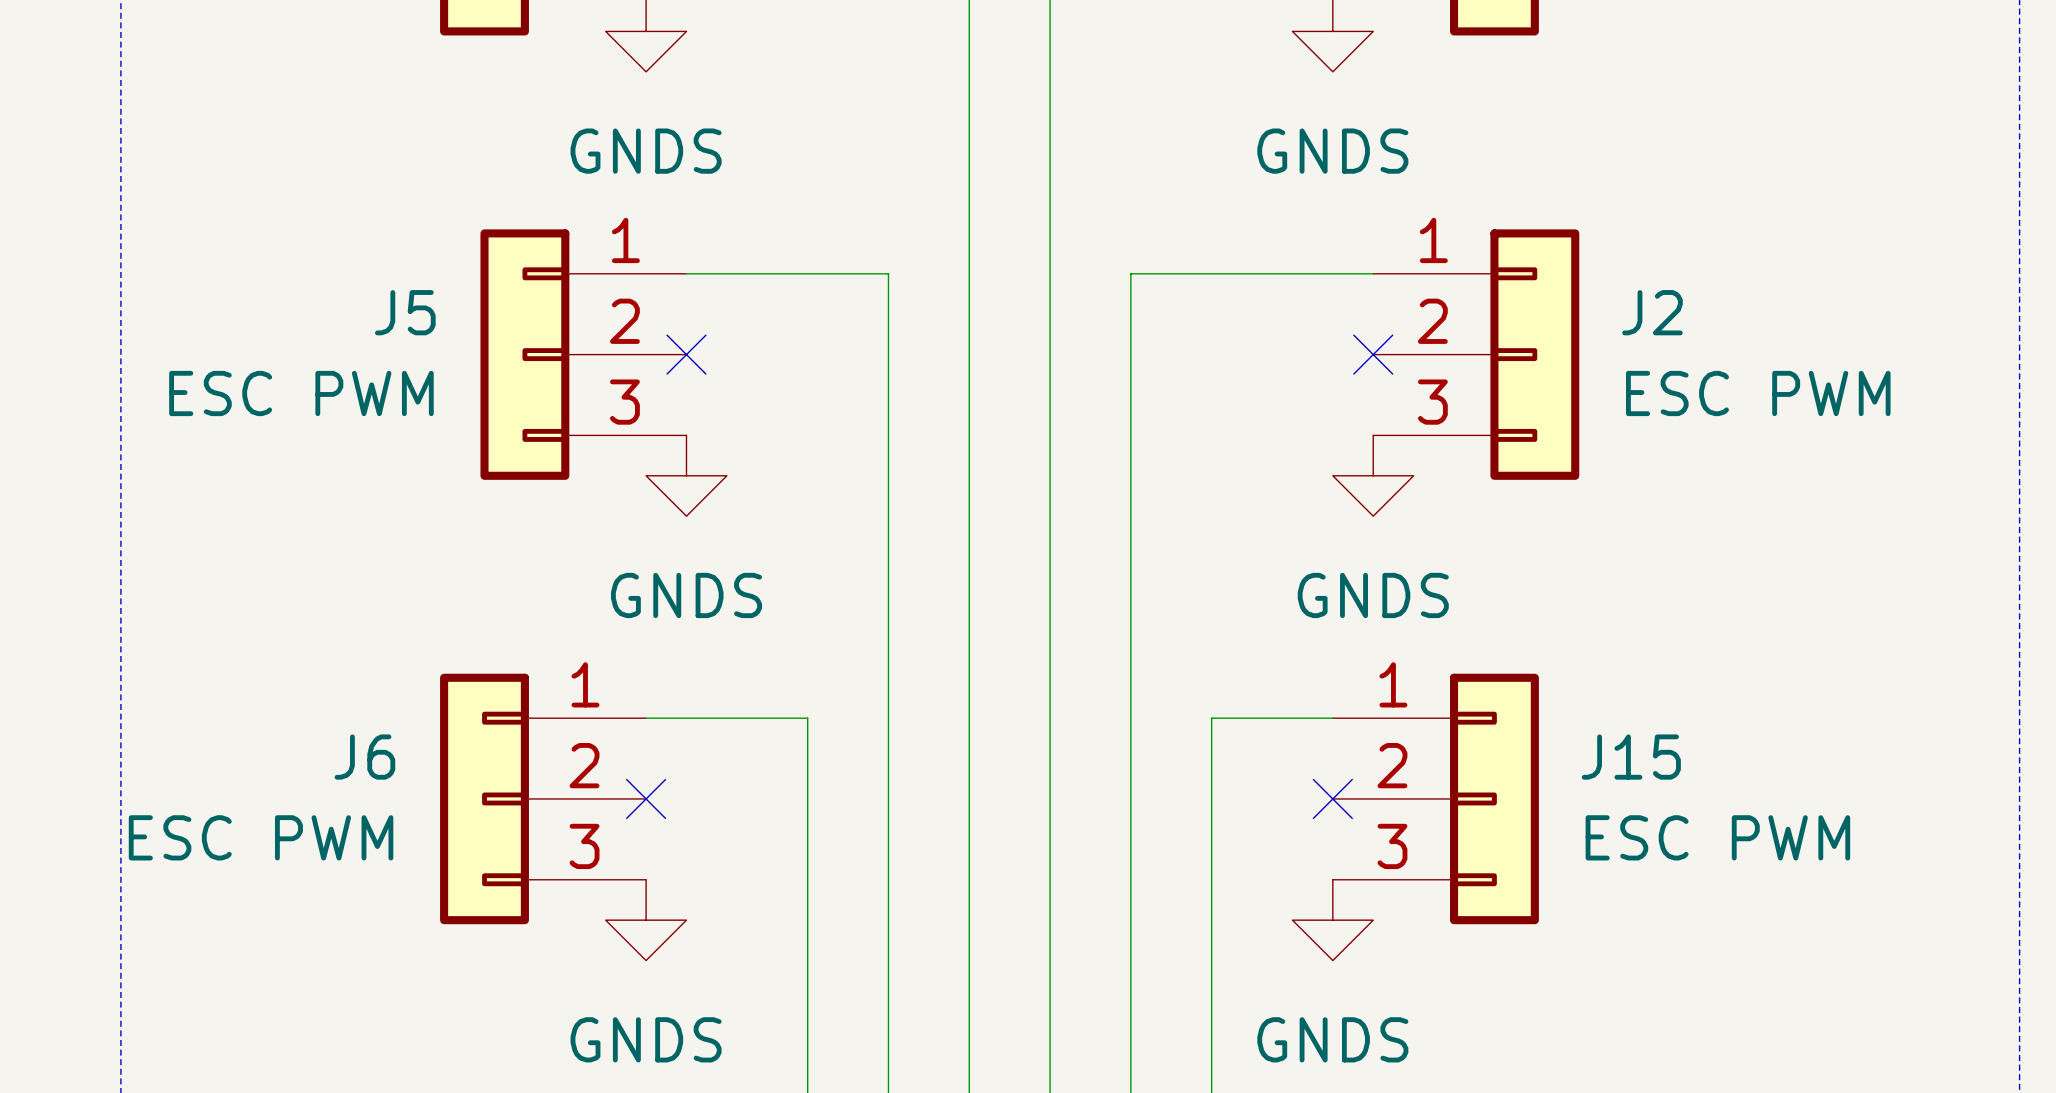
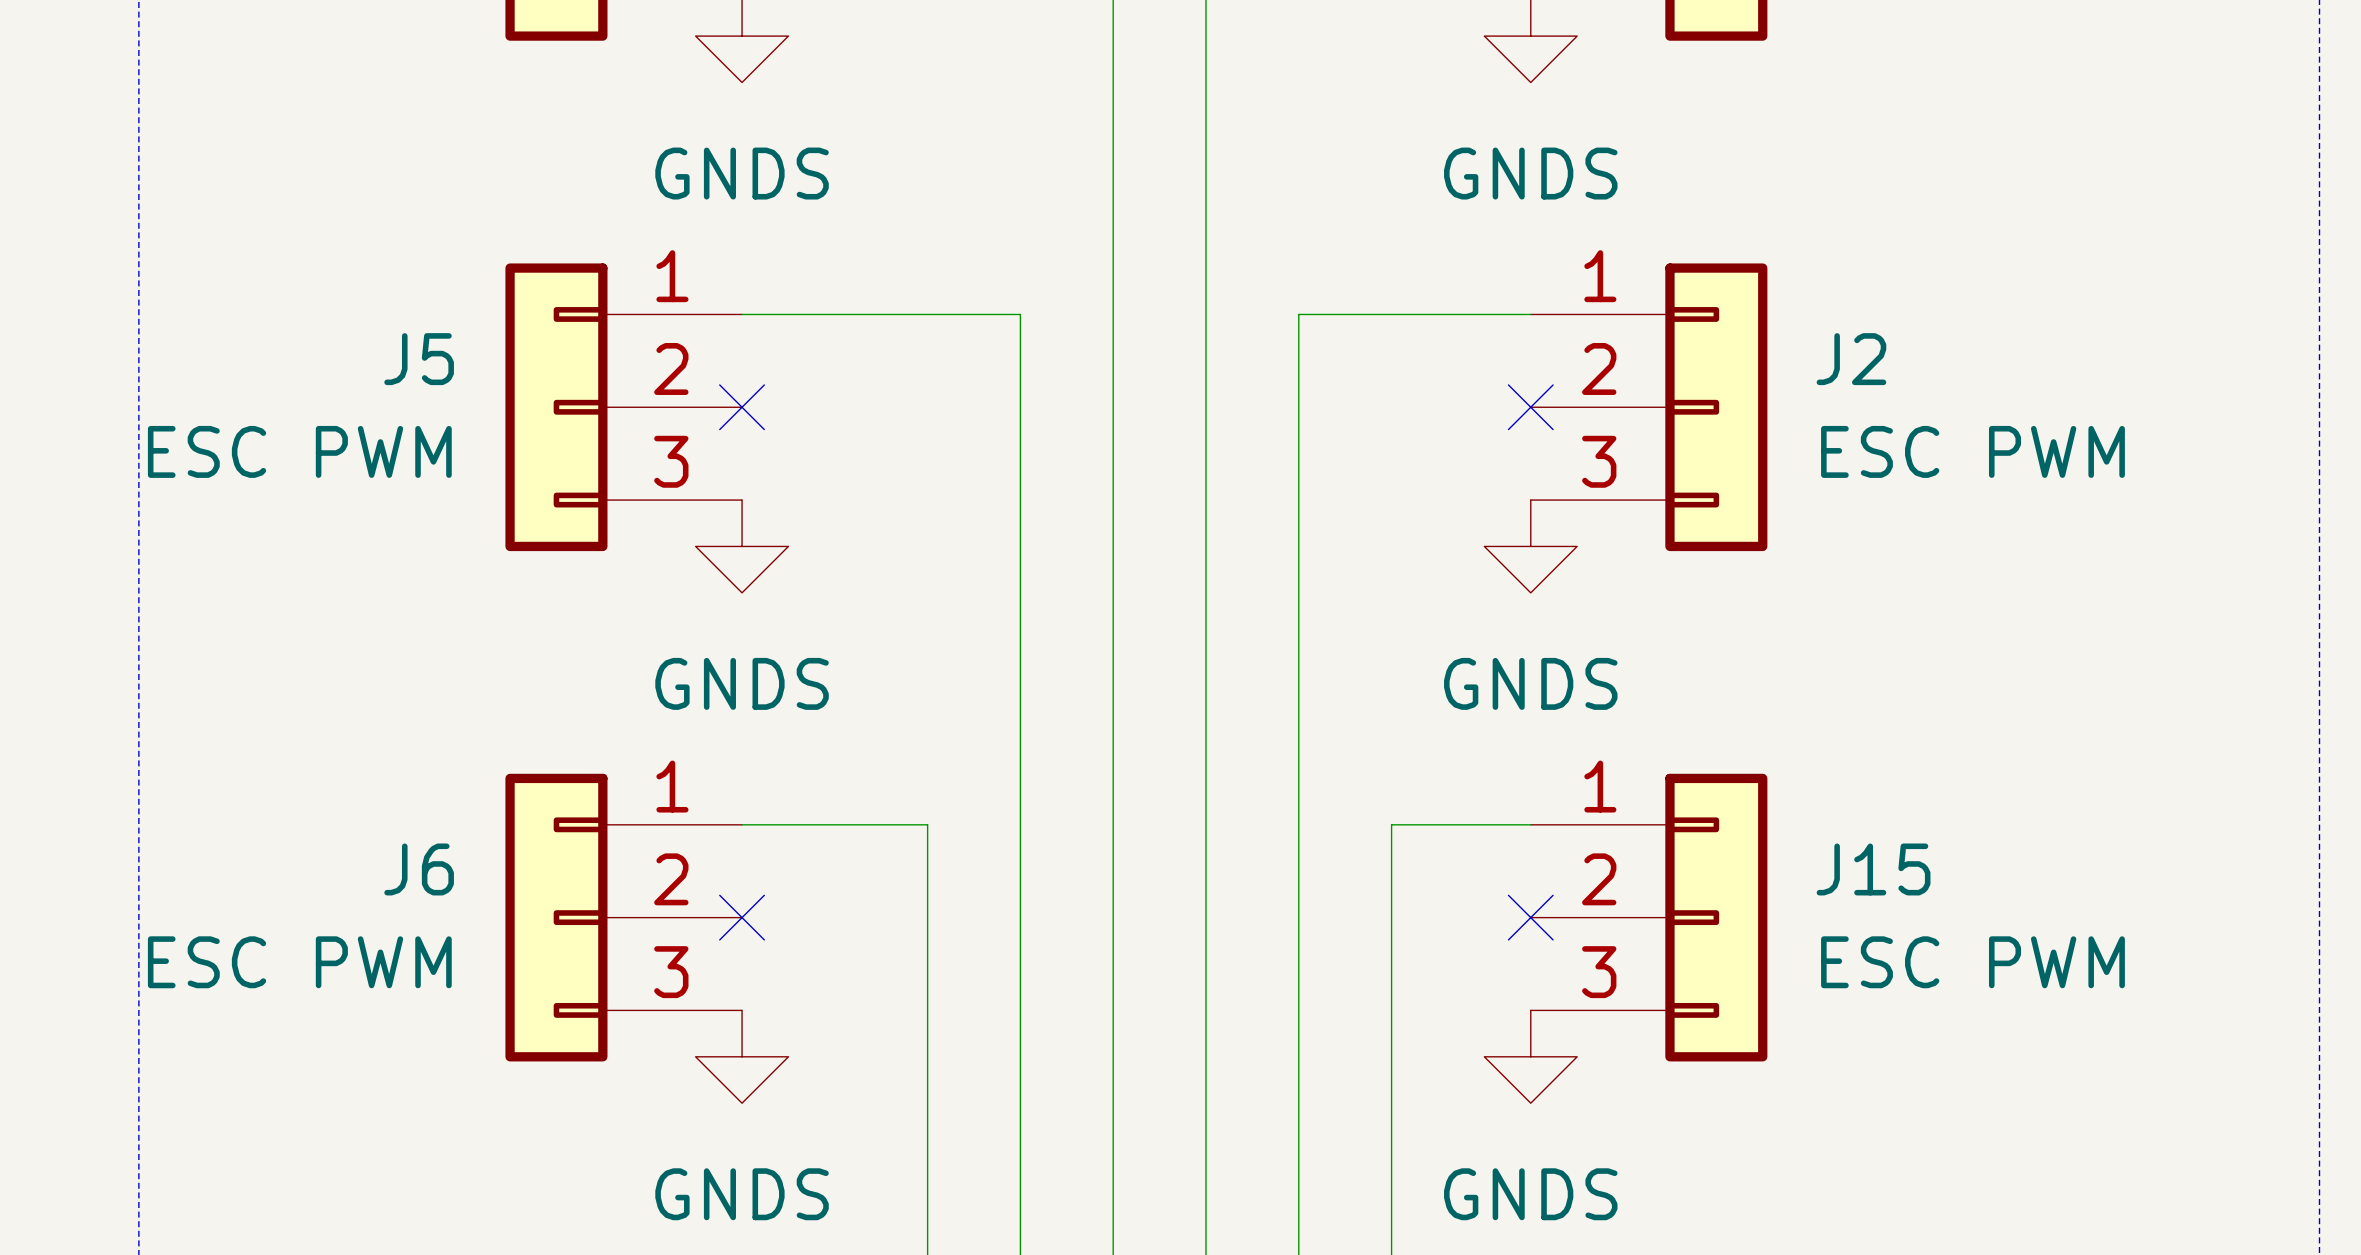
J5 position: (583, 354) -> (623, 407)
no-connect mark position: (686, 354) -> (742, 407)
no-connect mark position: (1373, 354) -> (1530, 407)
J2 position: (1476, 354) -> (1649, 407)
power symbol position: GNDS (686, 475) -> GNDS (742, 546)
power symbol position: GNDS (1373, 475) -> GNDS (1530, 546)

